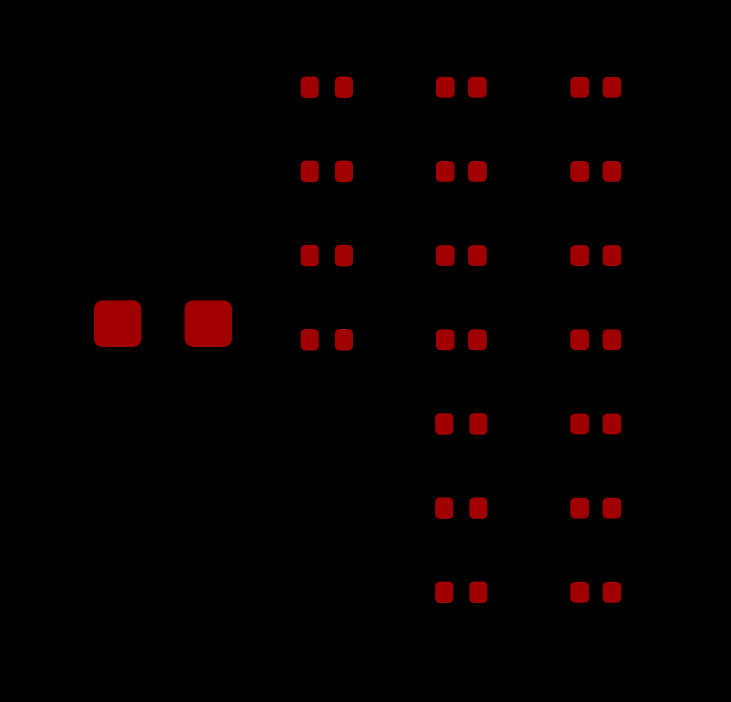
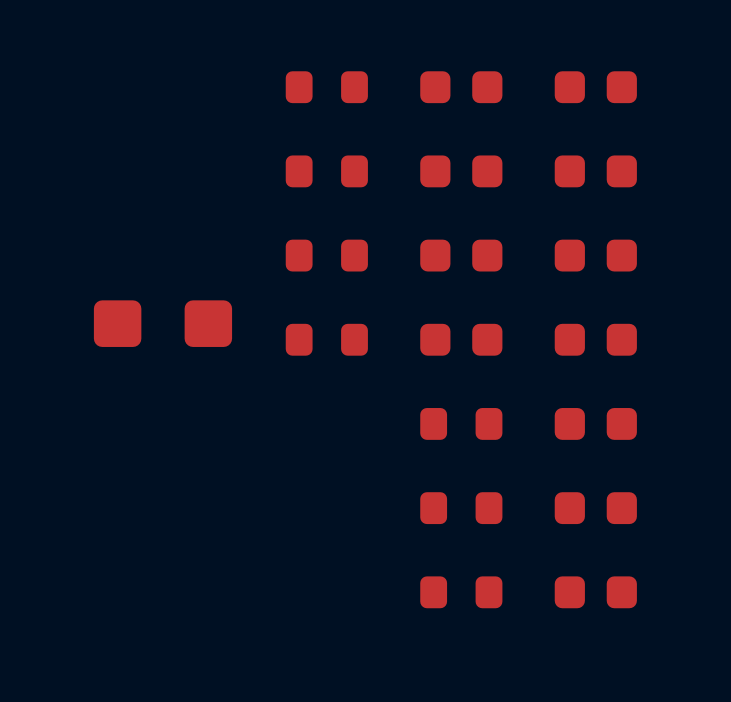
part footprint: [300, 76, 353, 98] -> [285, 71, 368, 104]
part footprint: [435, 76, 487, 98] -> [420, 71, 503, 104]
part footprint: [570, 76, 622, 98] -> [554, 71, 637, 104]
part footprint: [300, 160, 353, 183] -> [285, 155, 368, 188]
part footprint: [435, 160, 487, 182] -> [420, 155, 503, 188]
part footprint: [570, 160, 622, 182] -> [554, 155, 637, 188]
part footprint: [300, 244, 353, 267] -> [285, 239, 368, 272]
part footprint: [435, 245, 487, 266] -> [420, 239, 503, 272]
part footprint: [570, 245, 622, 266] -> [554, 239, 637, 272]
part footprint: [300, 329, 353, 351] -> [285, 323, 368, 356]
part footprint: [435, 329, 487, 351] -> [420, 323, 503, 356]
part footprint: [570, 329, 622, 351] -> [554, 323, 637, 356]
part footprint: [435, 413, 488, 435] -> [420, 408, 503, 440]
part footprint: [570, 413, 622, 435] -> [554, 408, 637, 440]
part footprint: [435, 497, 488, 519] -> [420, 492, 503, 525]
part footprint: [570, 497, 622, 519] -> [554, 492, 637, 525]
part footprint: [435, 581, 488, 604] -> [420, 576, 503, 609]
part footprint: [570, 581, 622, 603] -> [554, 576, 637, 609]

